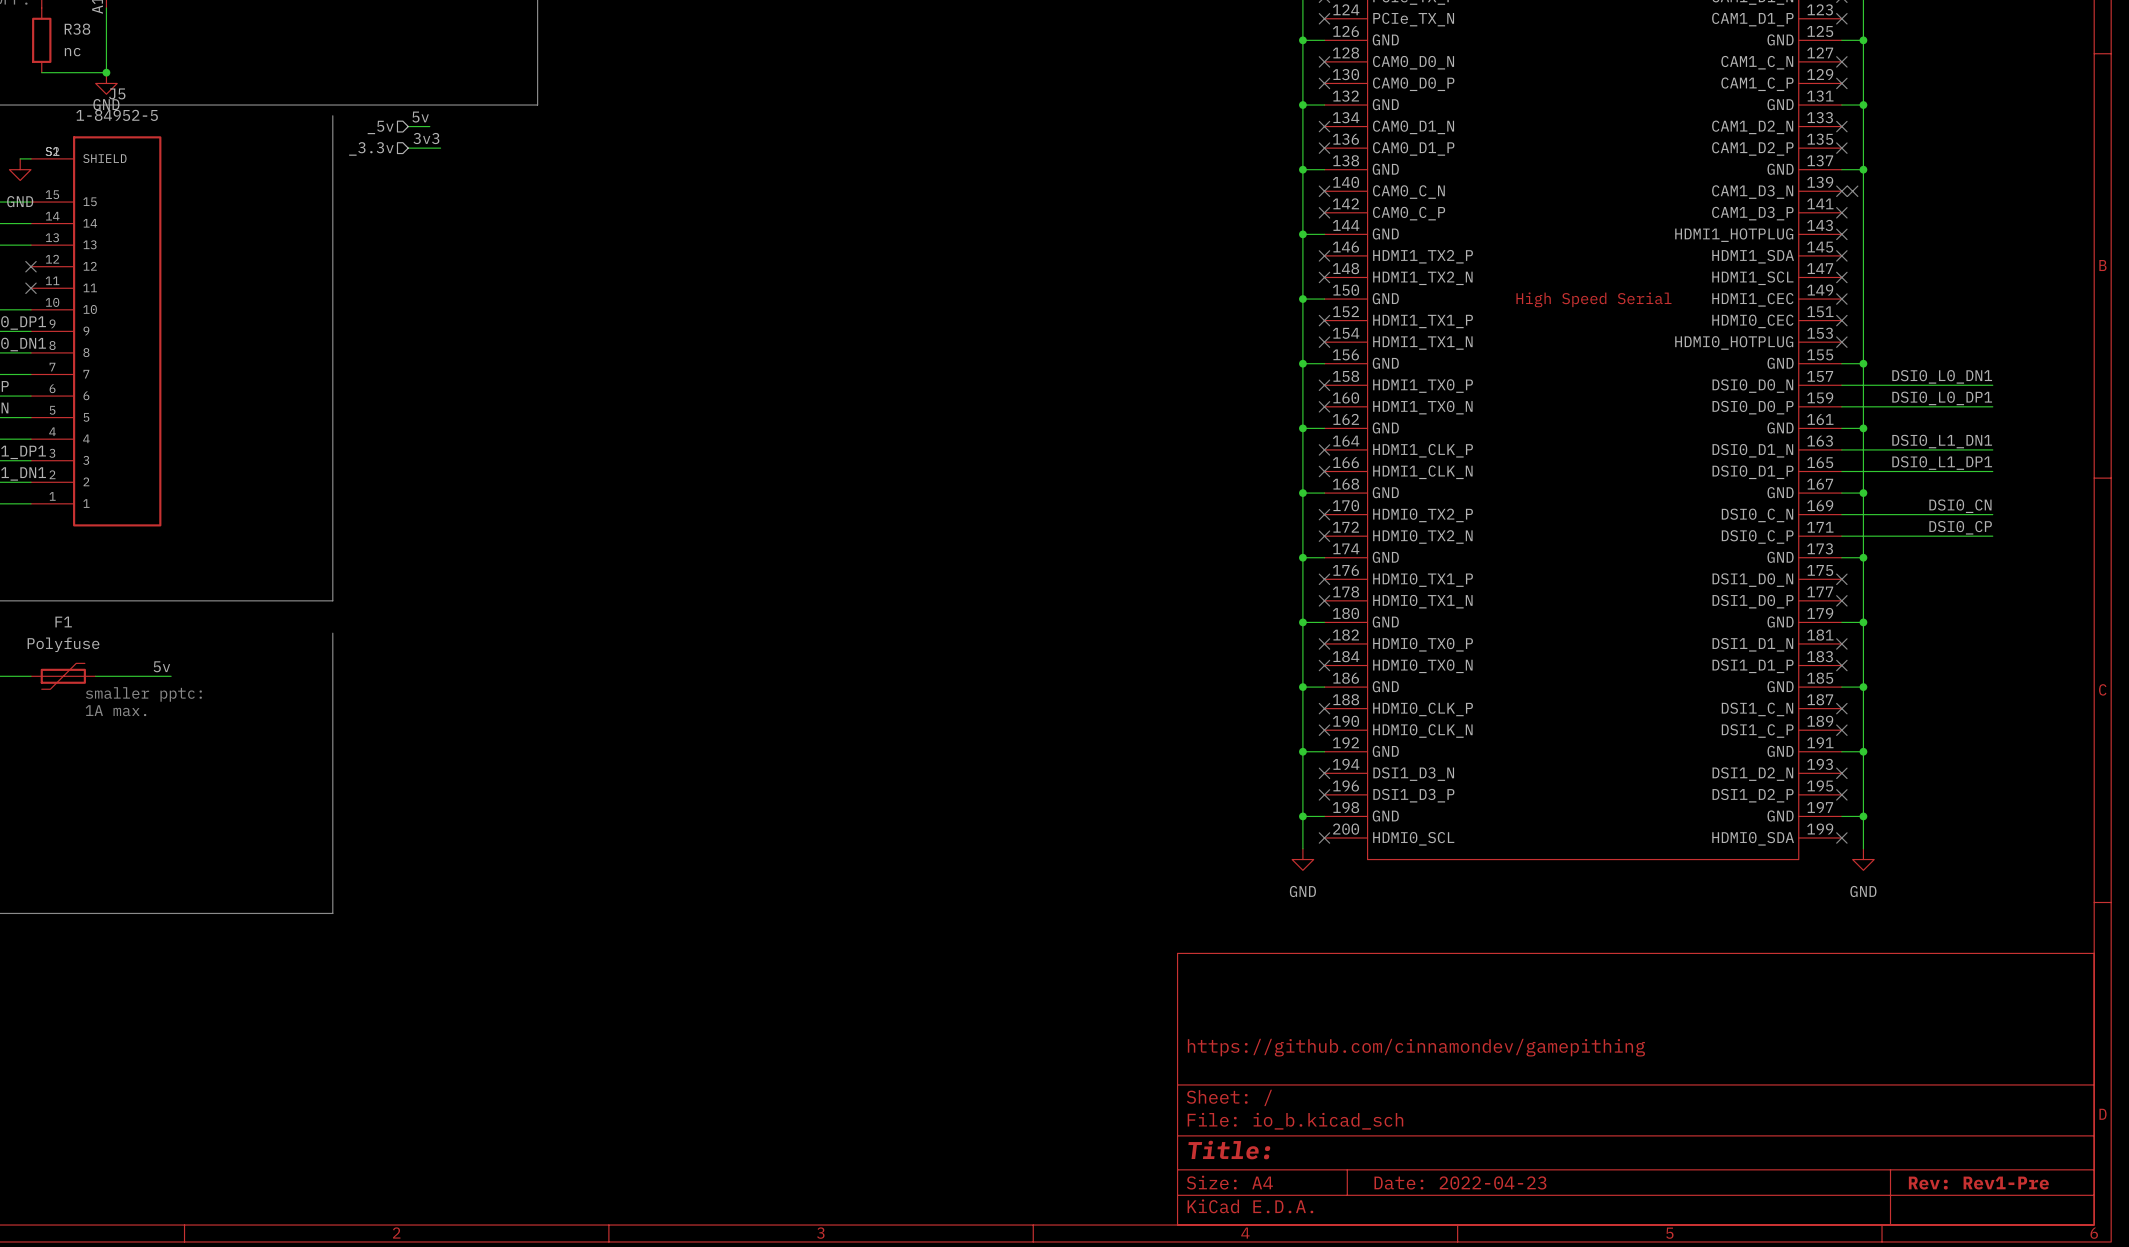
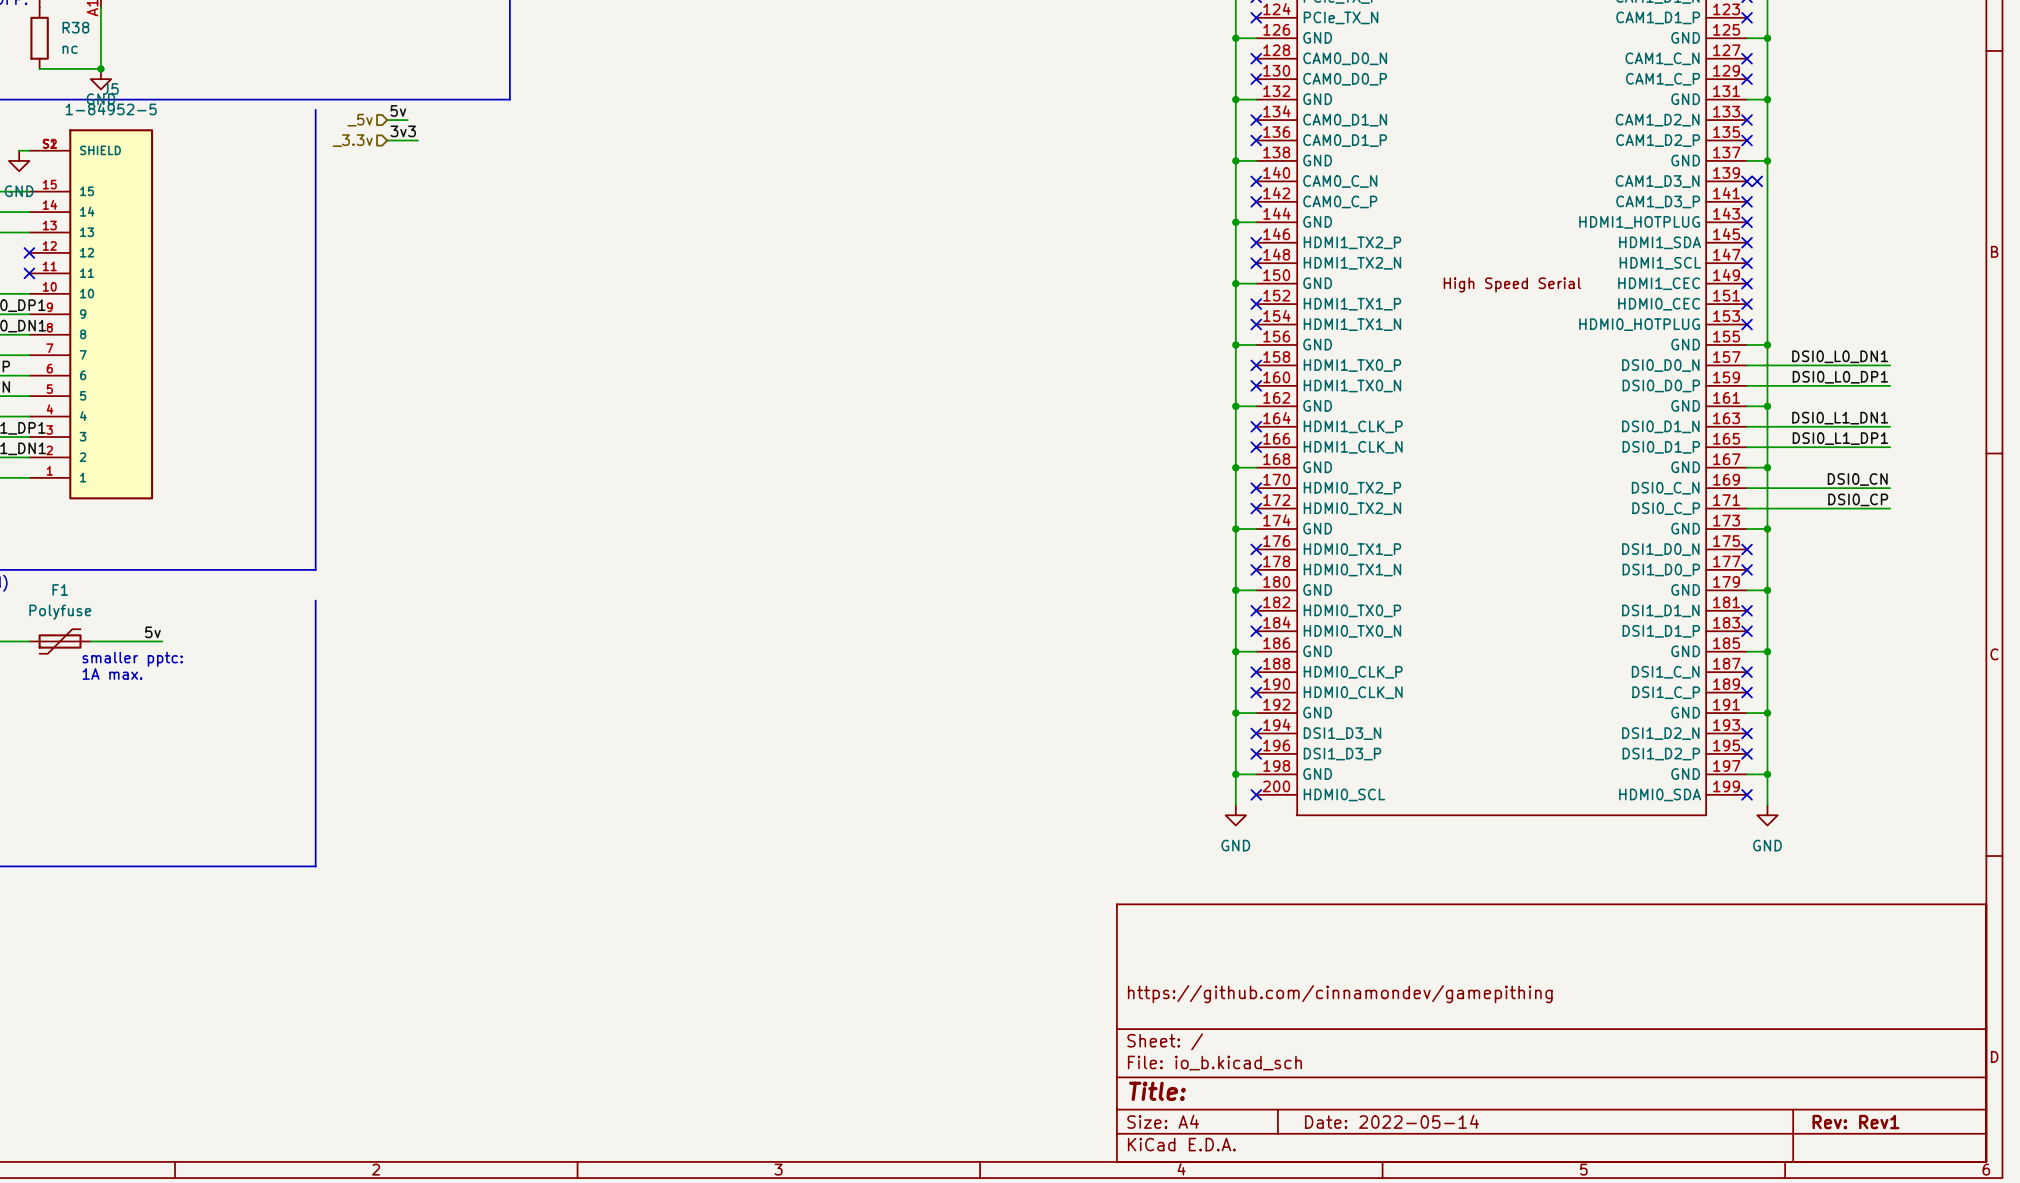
title block: Date: 2022-04-23 (1460, 1182) -> Date: 2022-05-14 (1392, 1121)
title block: Rev: Rev1-Pre (1978, 1183) -> Rev: Rev1 (1855, 1122)

